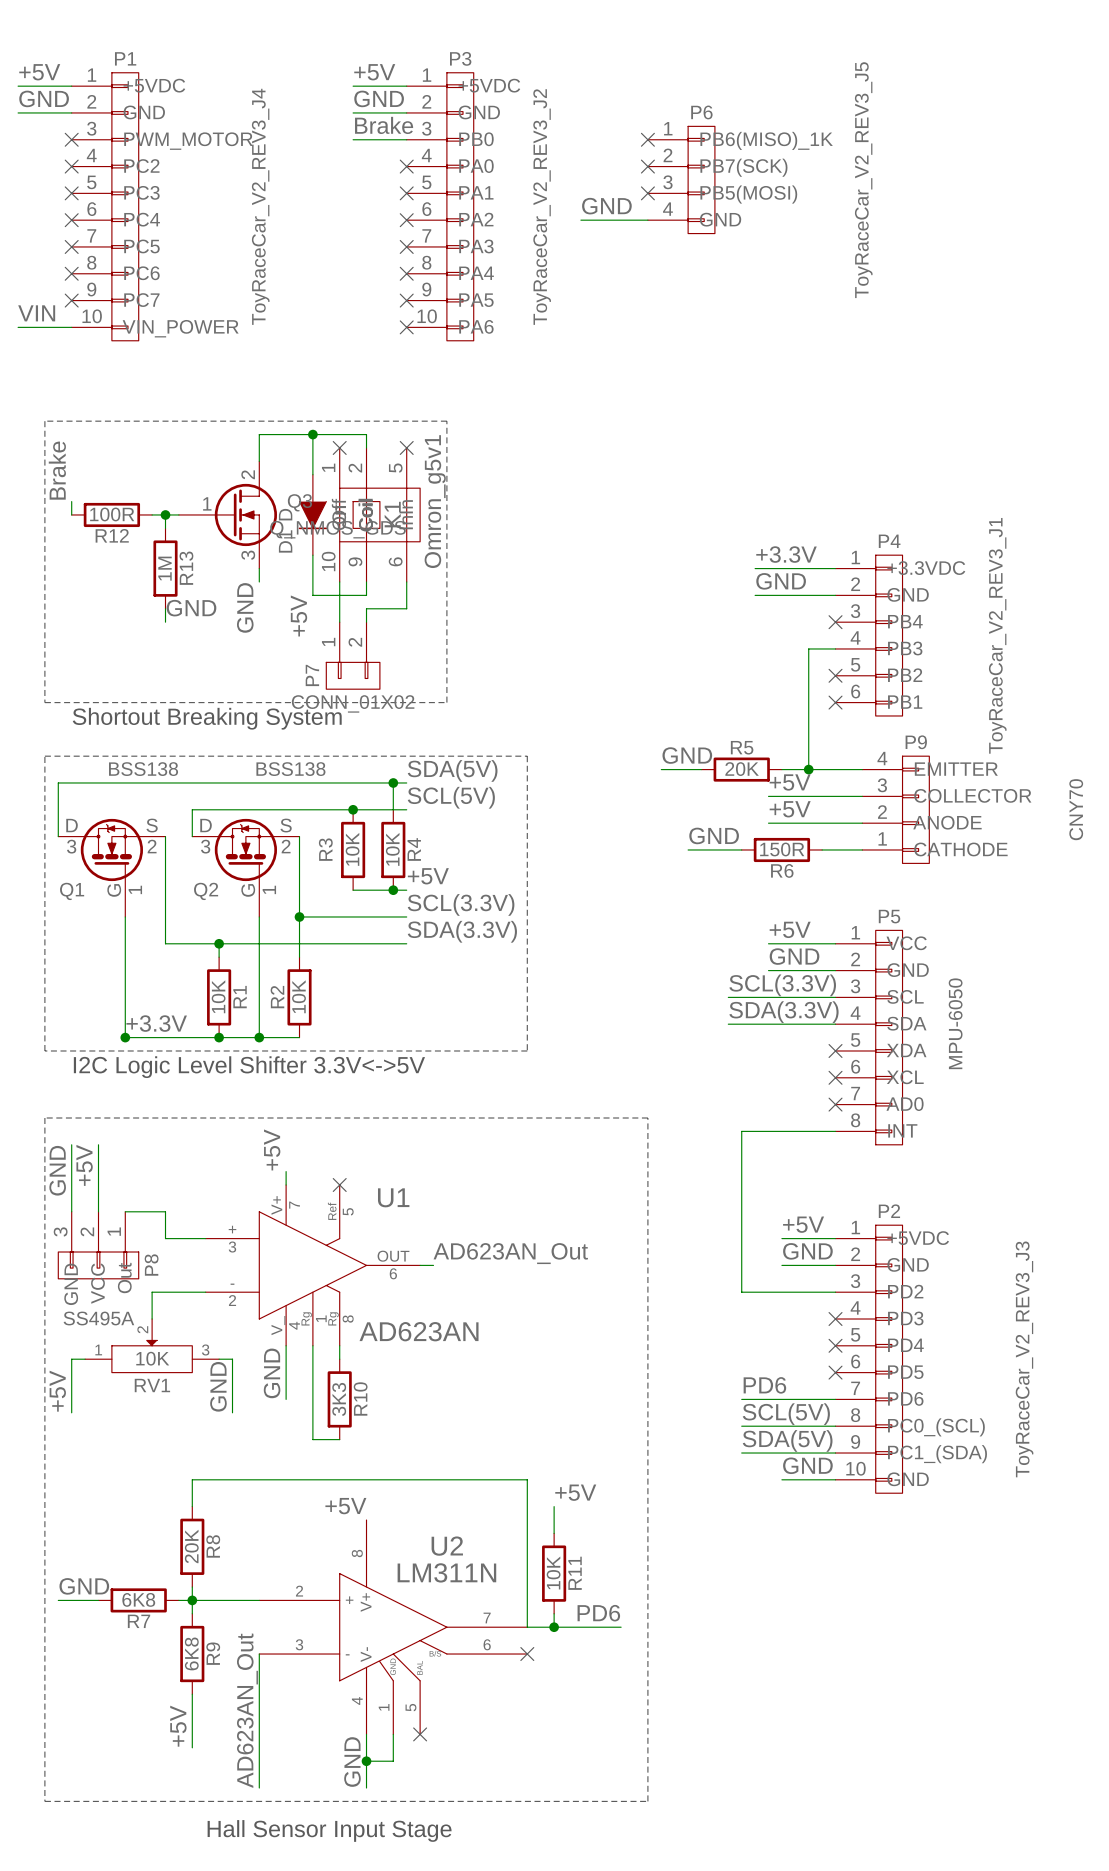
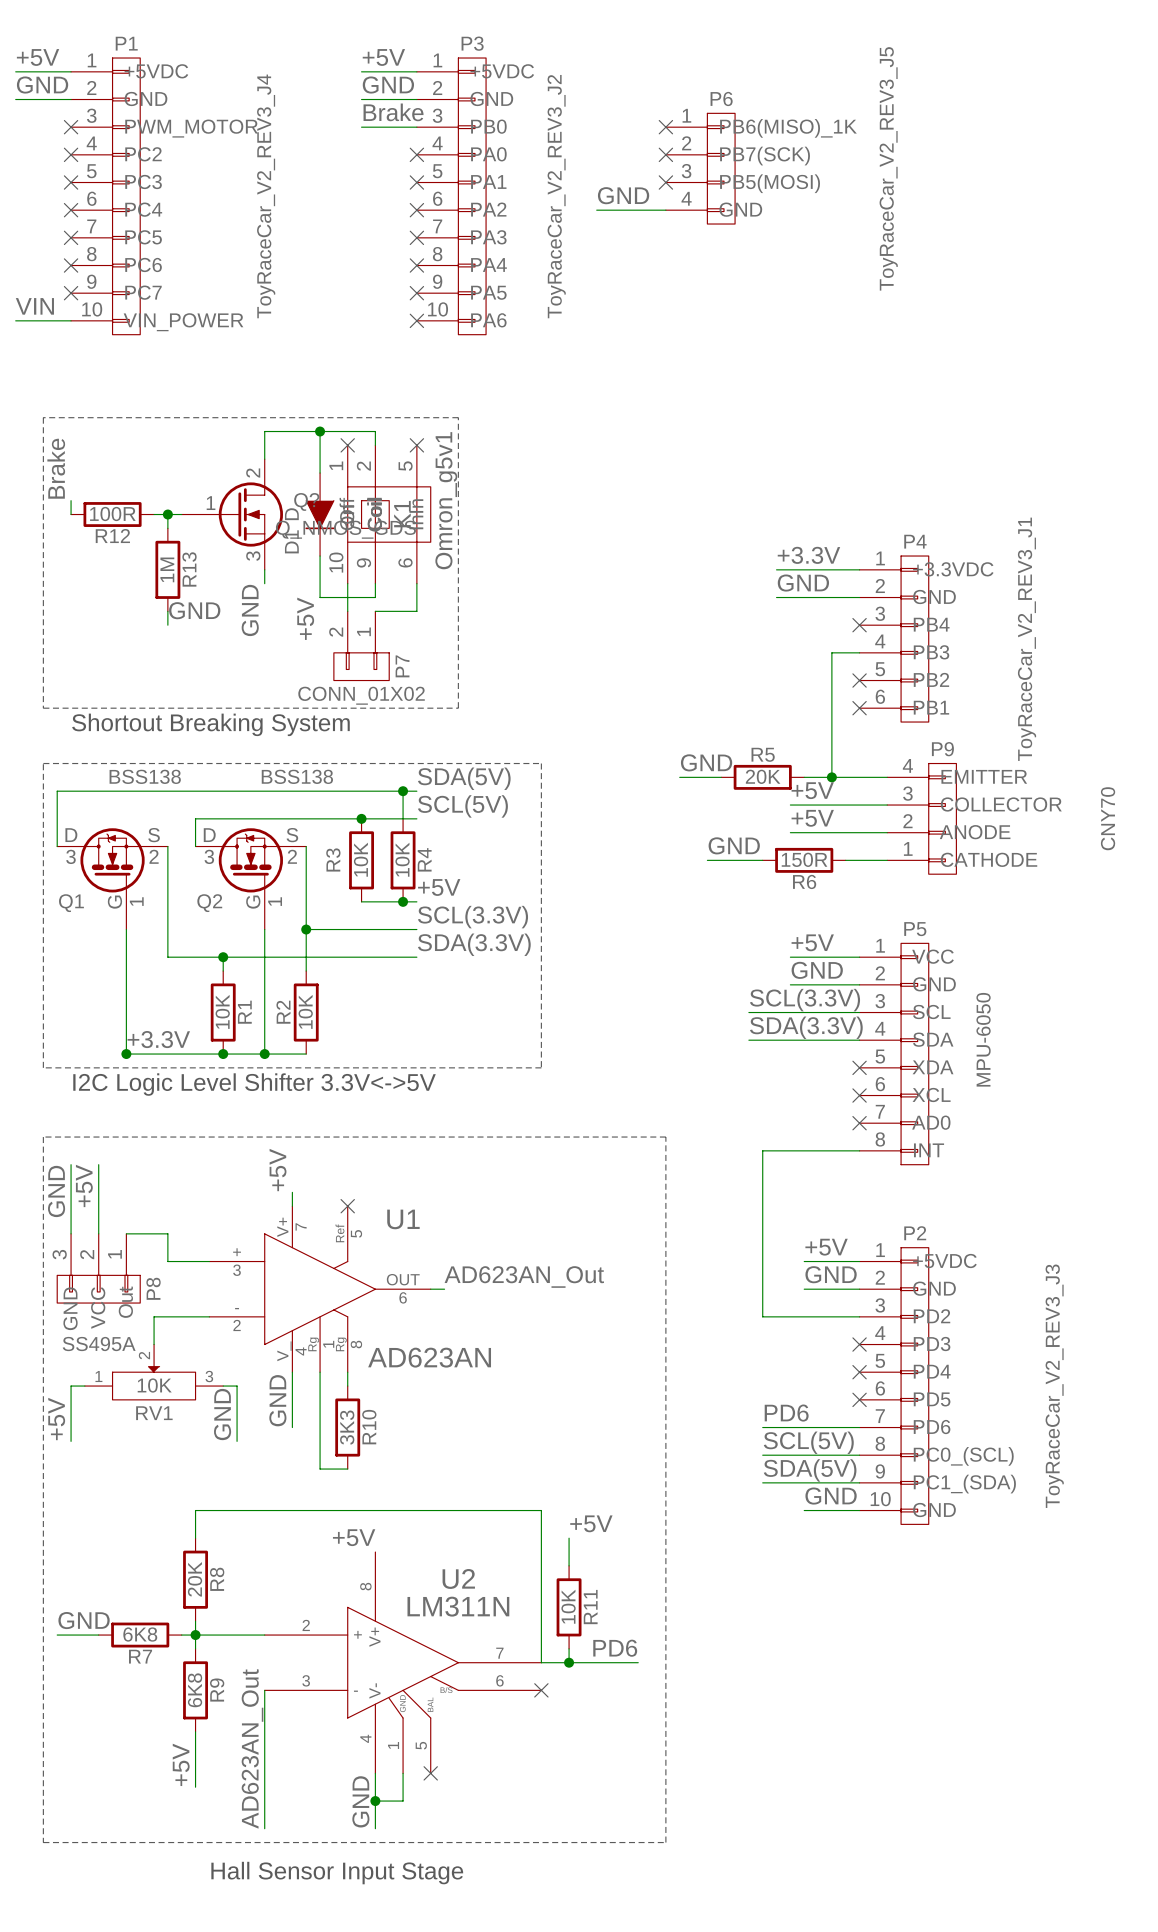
Q3 name: Q3 (299, 502) -> Q? (306, 501)
P7 flip: as is (353, 675) -> left-right (361, 666)

